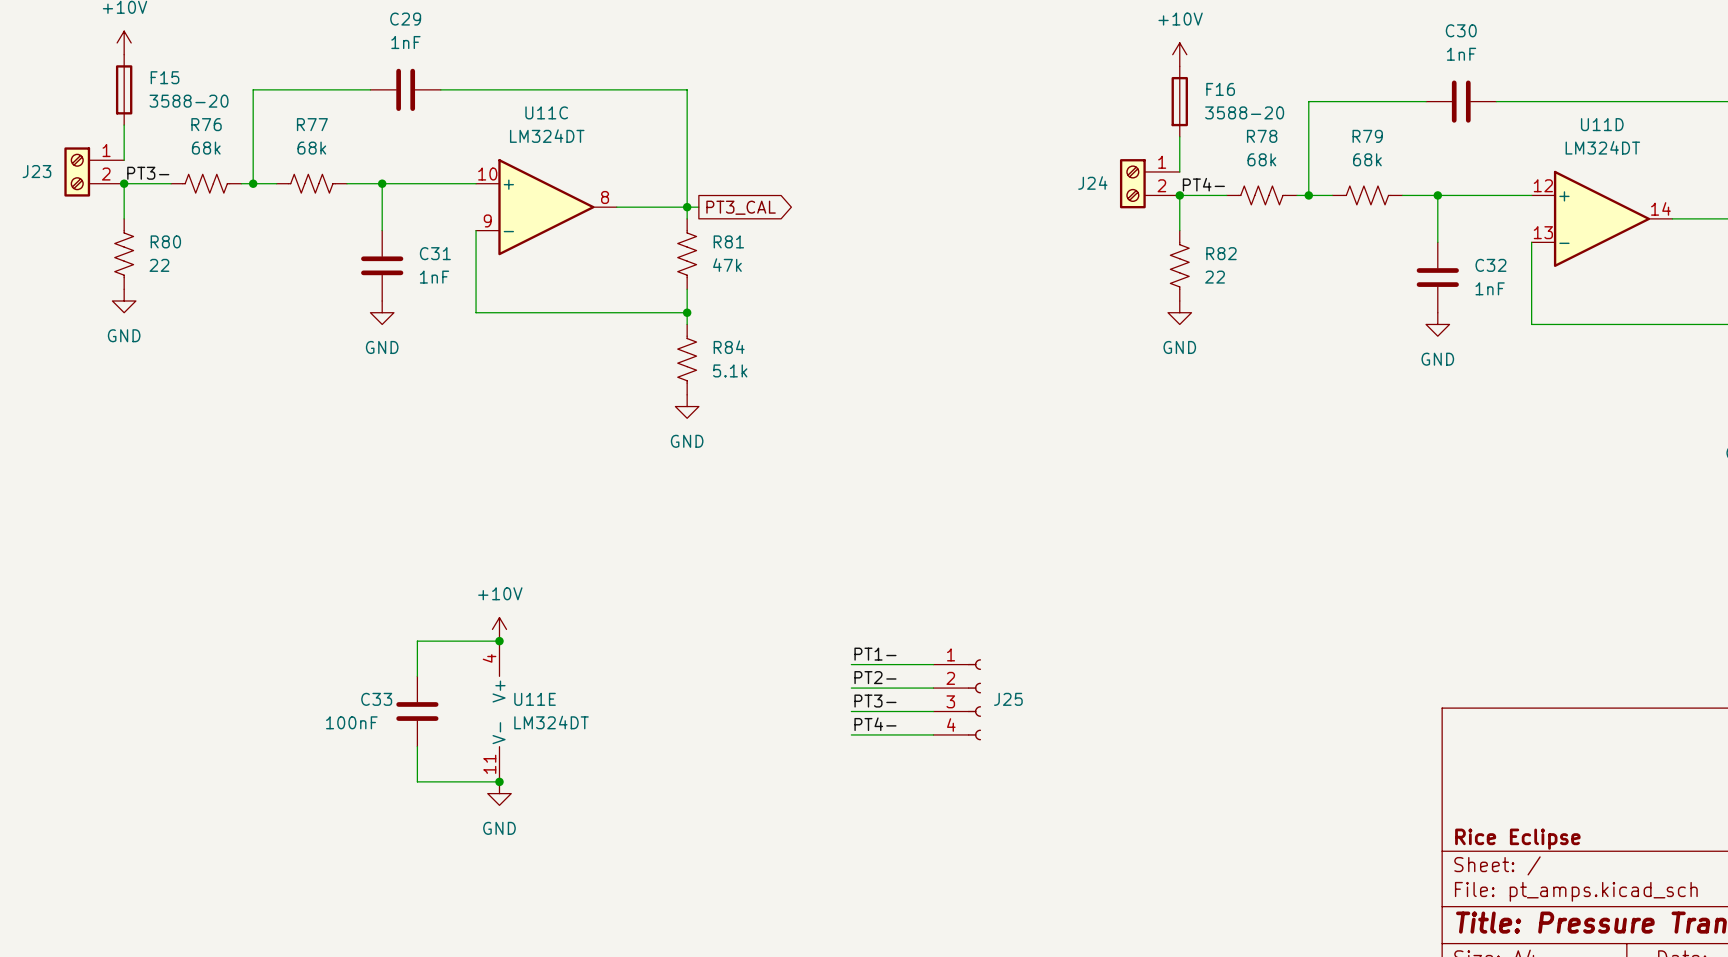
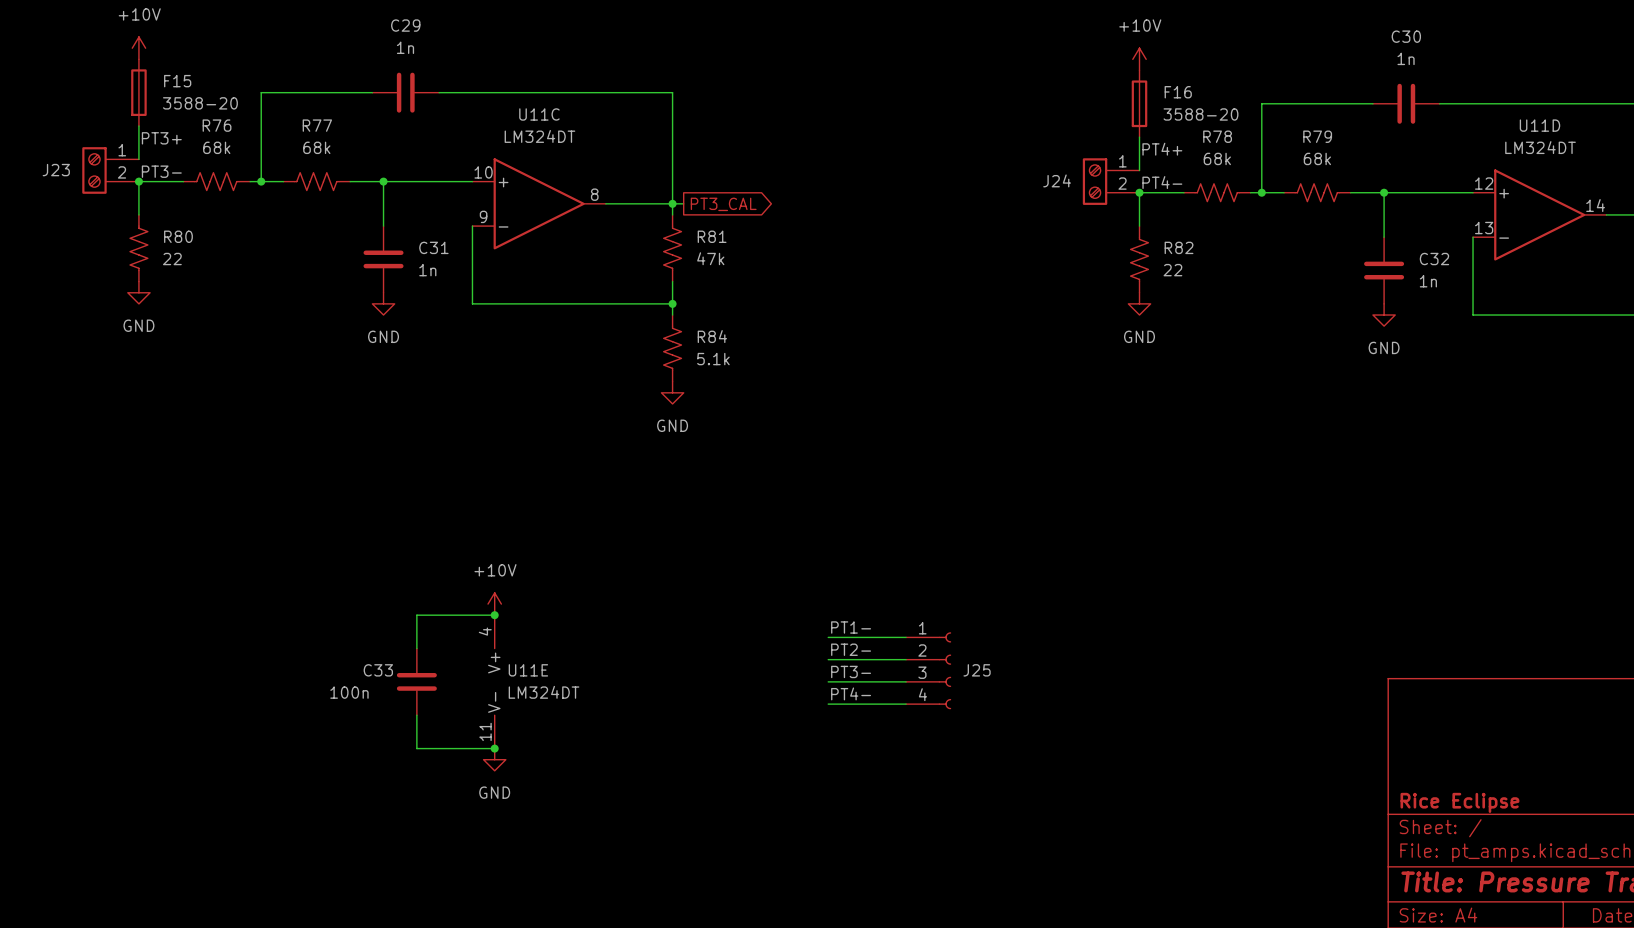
C29 value: 1nF (405, 42) -> 1n (405, 47)
C30 value: 1nF (1461, 54) -> 1n (1406, 58)
label: none -> PT3+ (161, 138)
label: none -> PT4+ (1162, 149)
C31 value: 1nF (434, 277) -> 1n (427, 270)
C32 value: 1nF (1490, 288) -> 1n (1428, 281)
C33 value: 100nF (351, 722) -> 100n (349, 692)

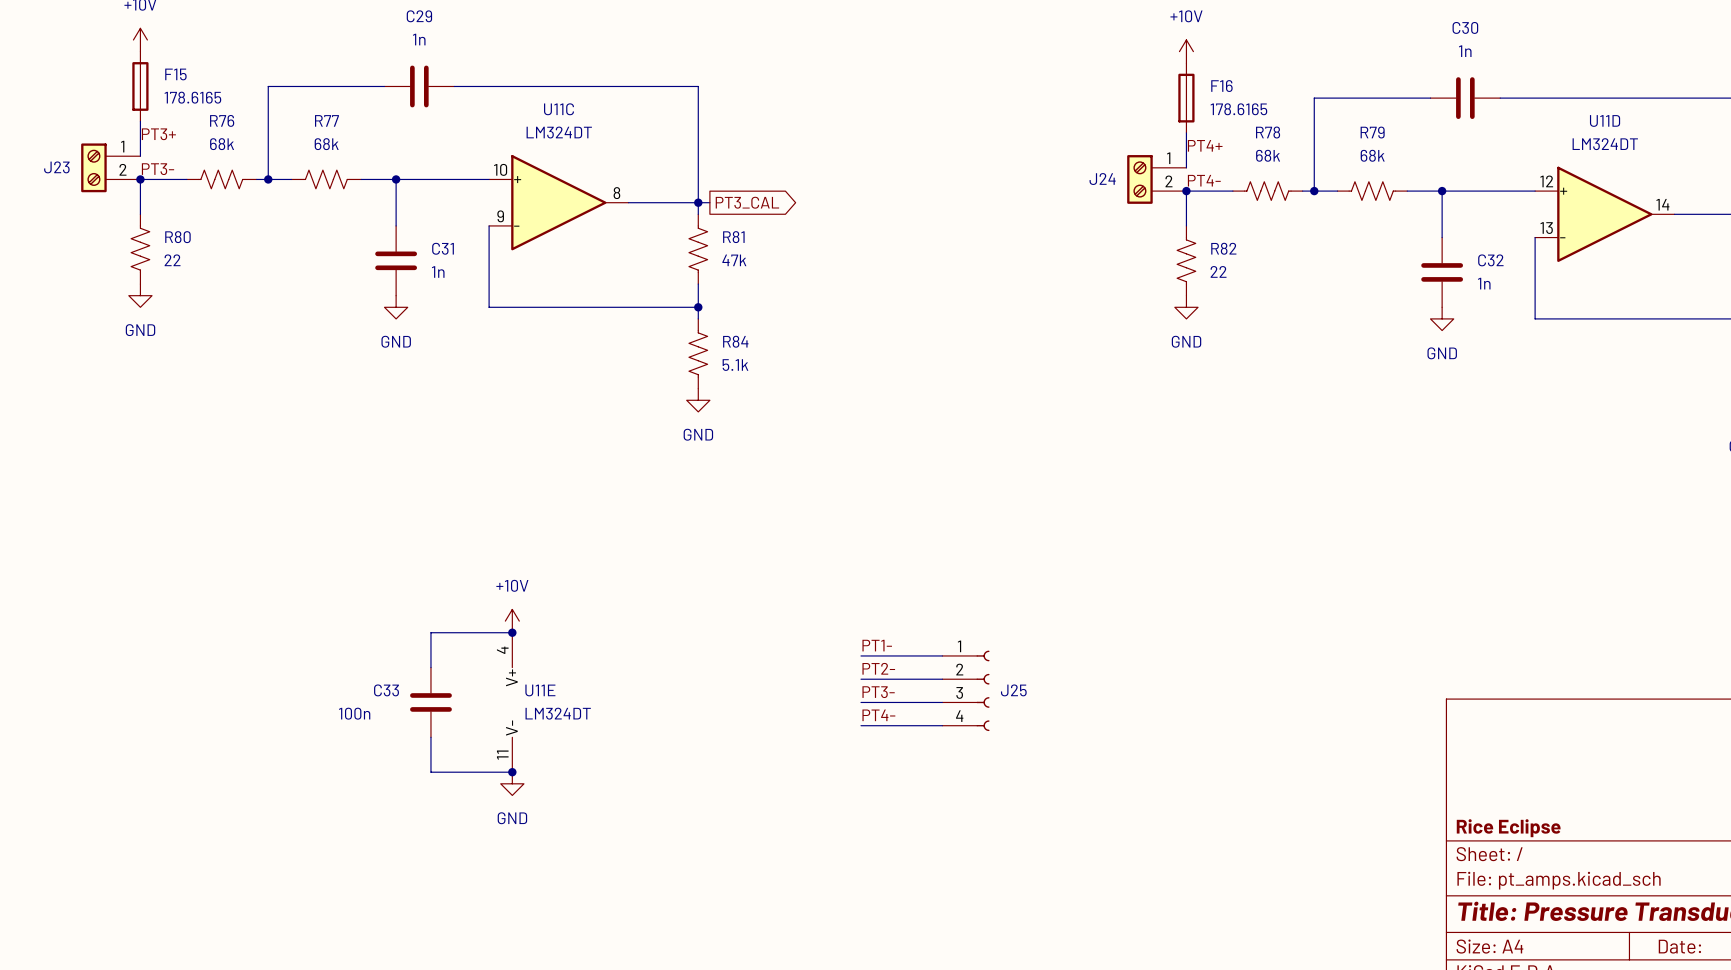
F15 value: 3588-20 (200, 103) -> 178.6165 (192, 97)
F16 value: 3588-20 (1200, 114) -> 178.6165 (1238, 109)

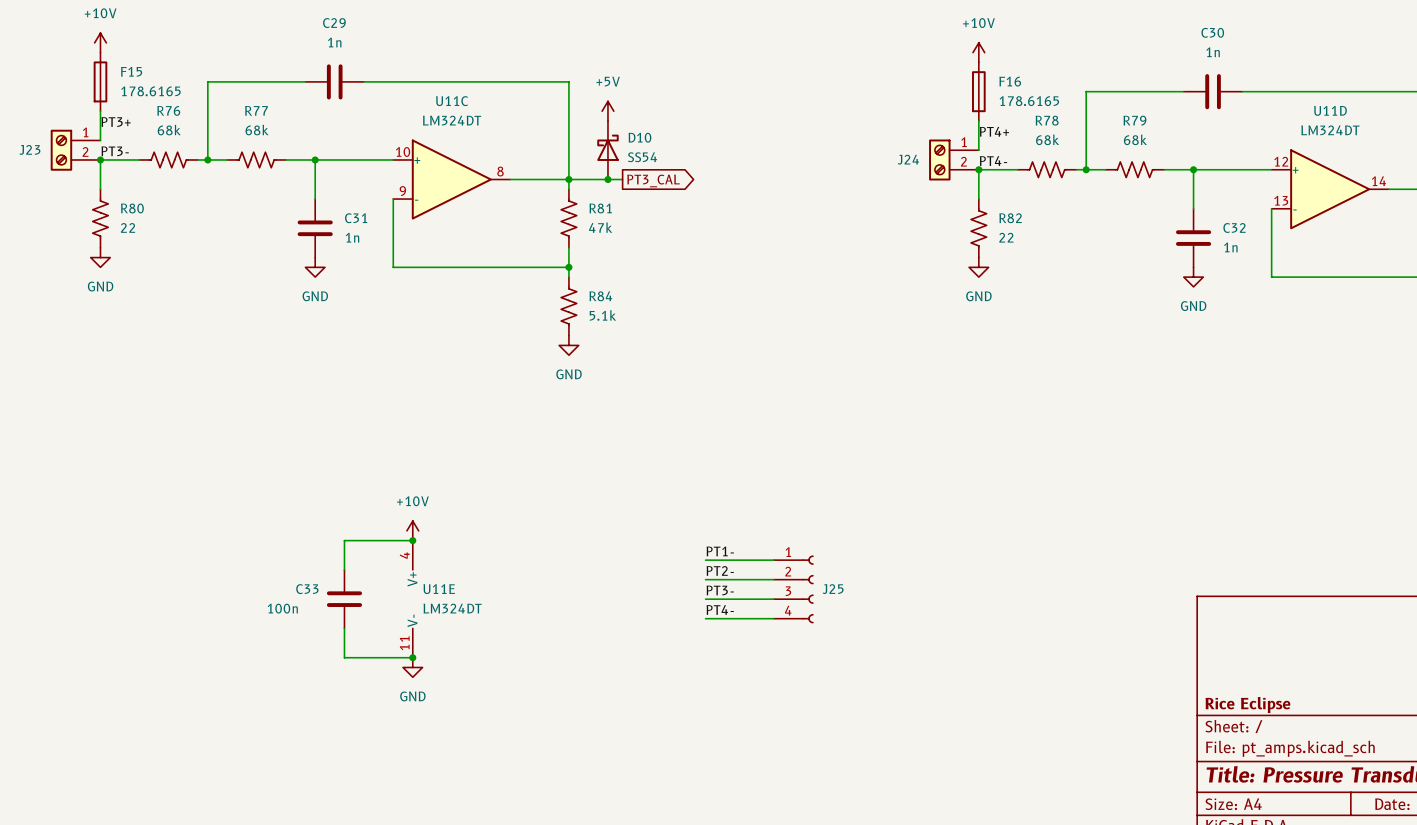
power symbol: none -> +5V (607, 111)
D10: none -> SS54 (607, 150)
wire: none -> (578, 179) (622, 179)
junction: none -> (607, 179)
global label position: PT3_CAL (747, 202) -> PT3_CAL (653, 180)

